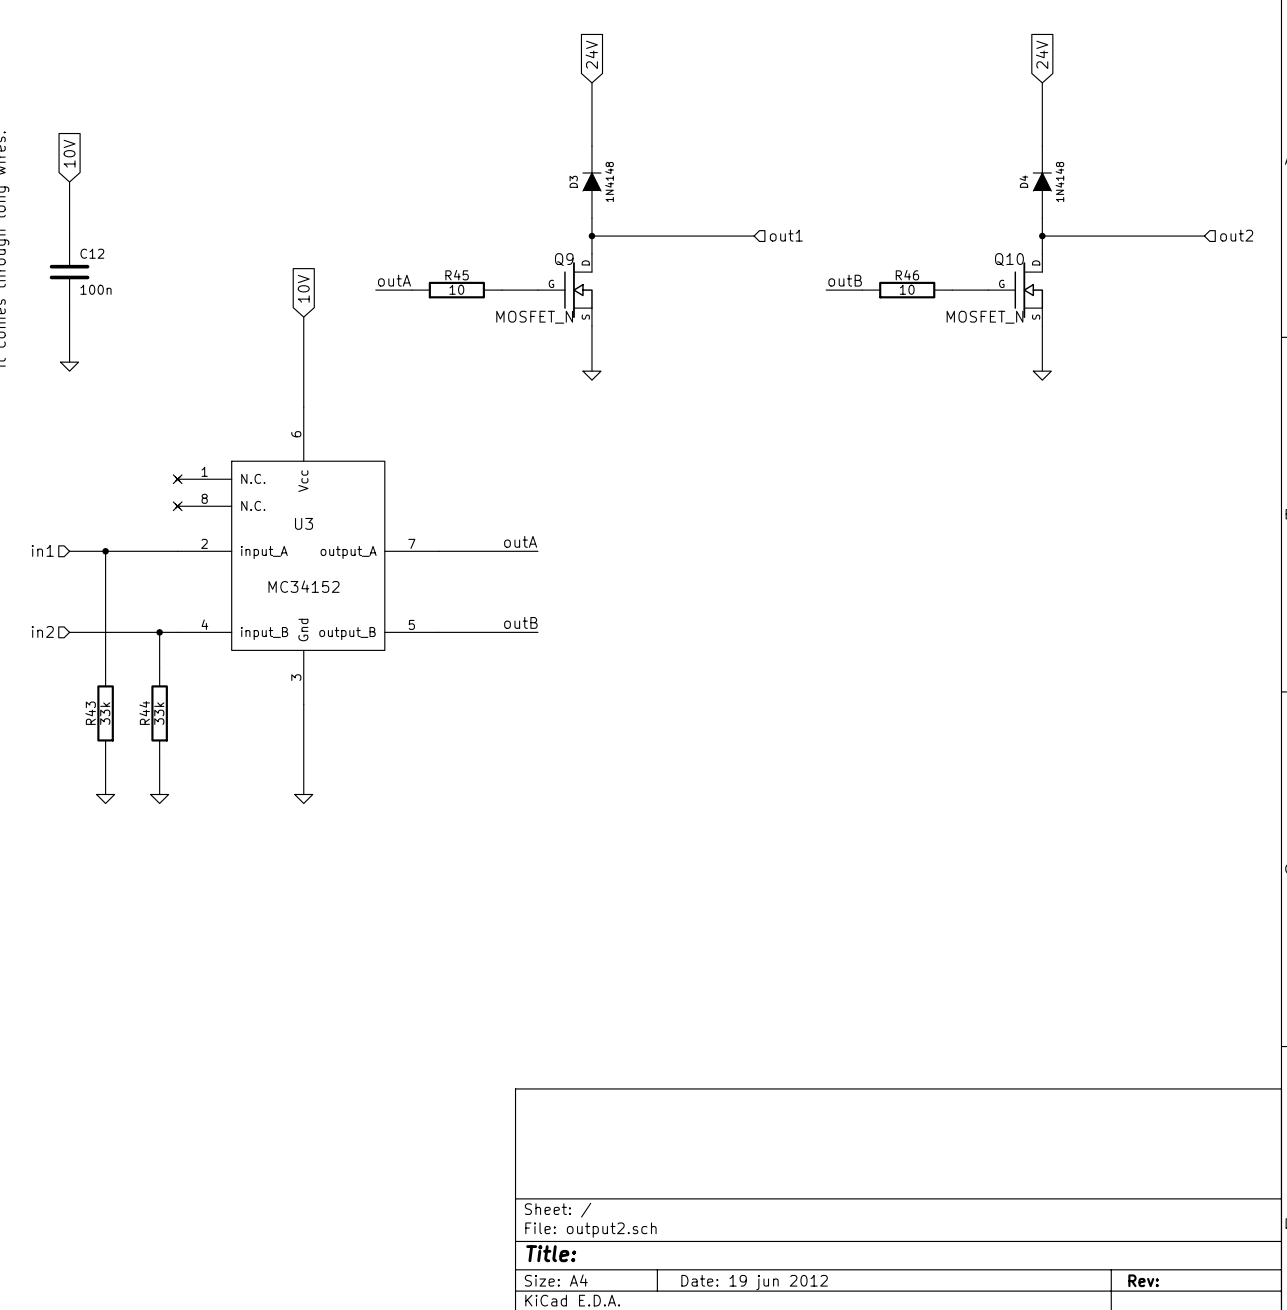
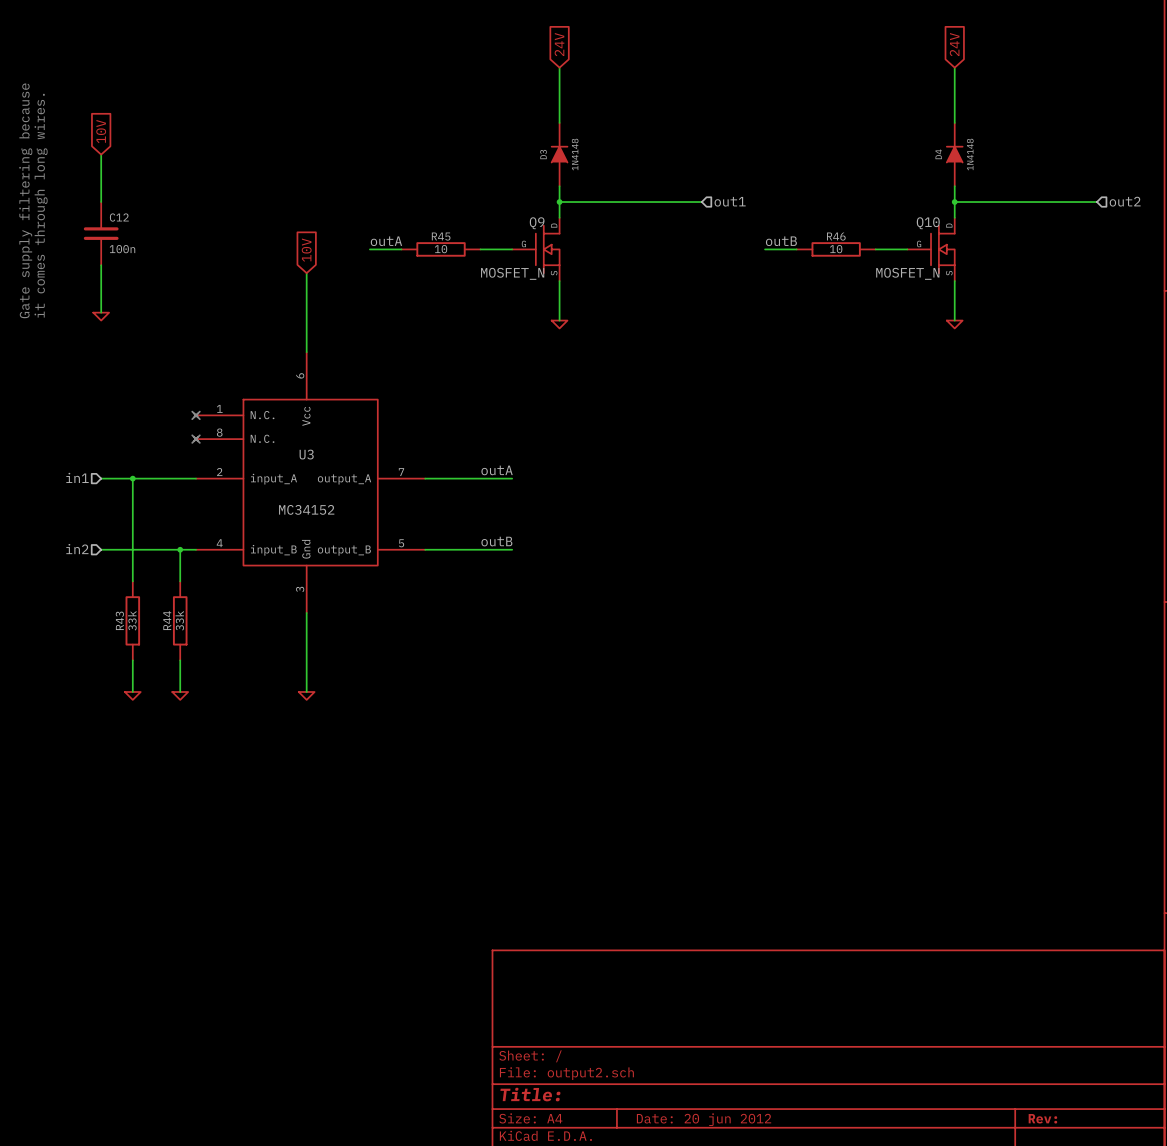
title block: Date: 19 jun 2012 (754, 1282) -> Date: 20 jun 2012 (704, 1119)

